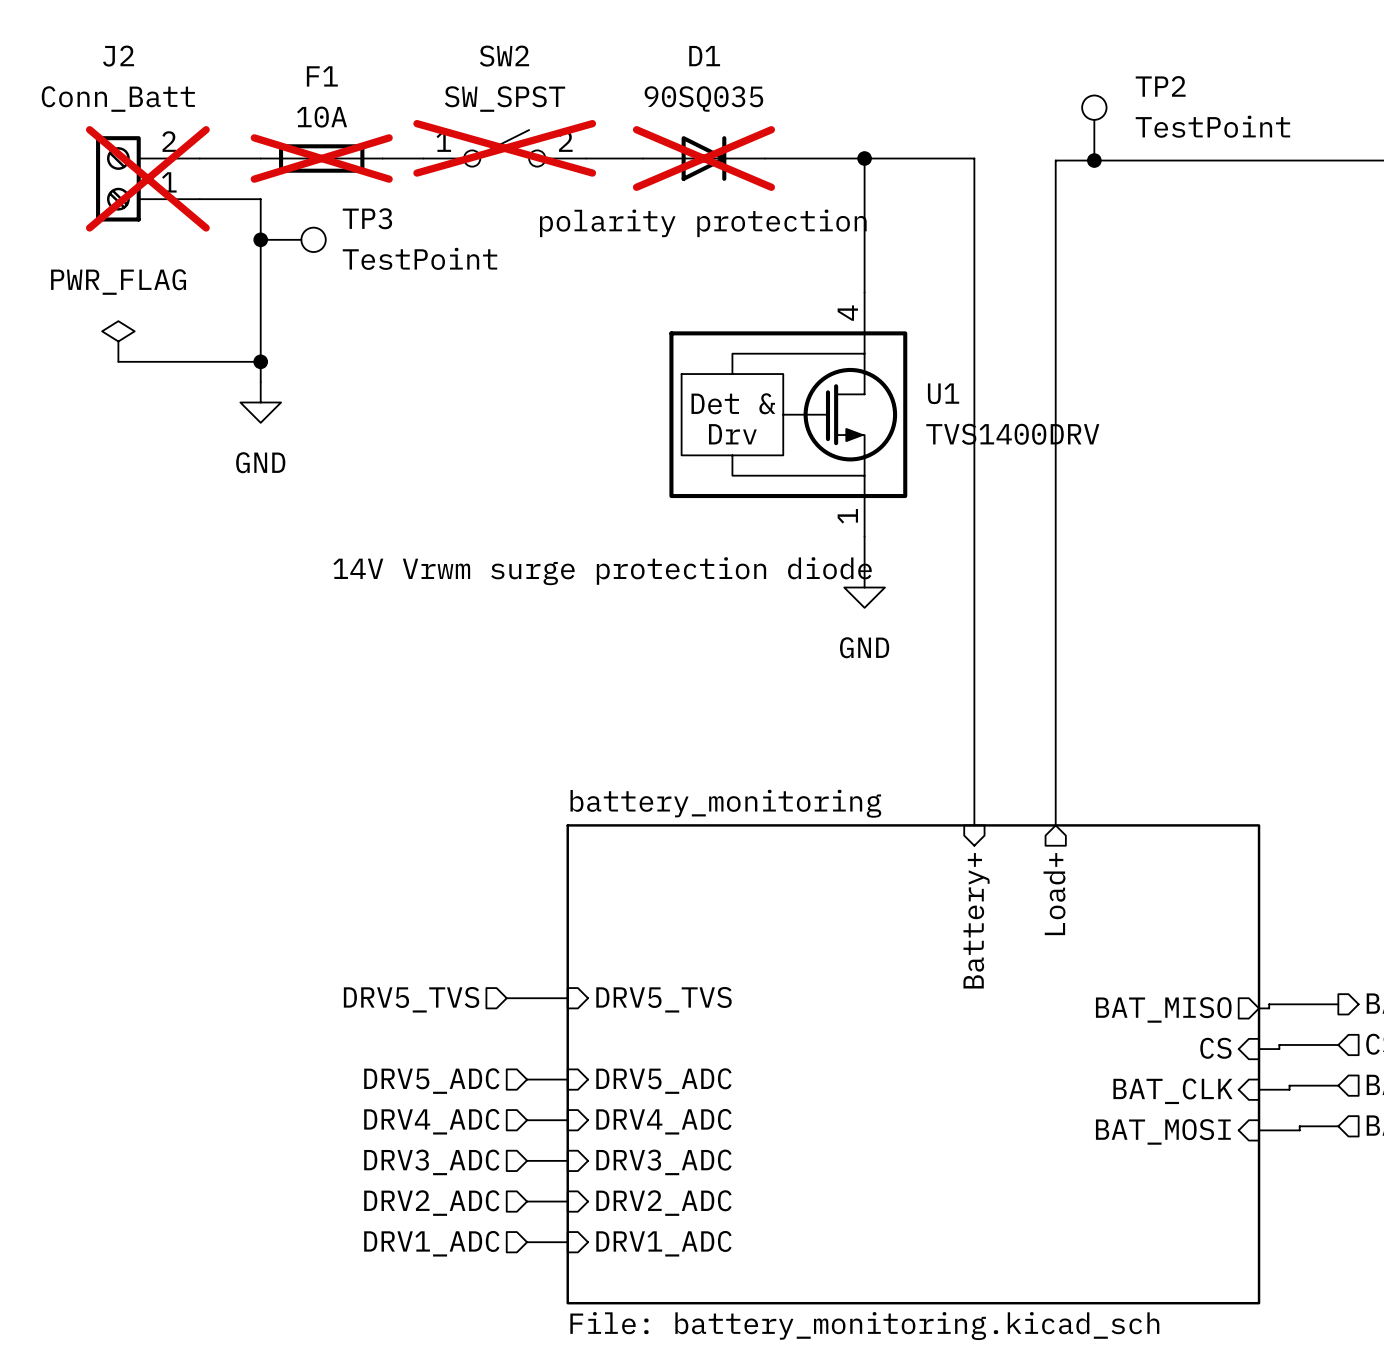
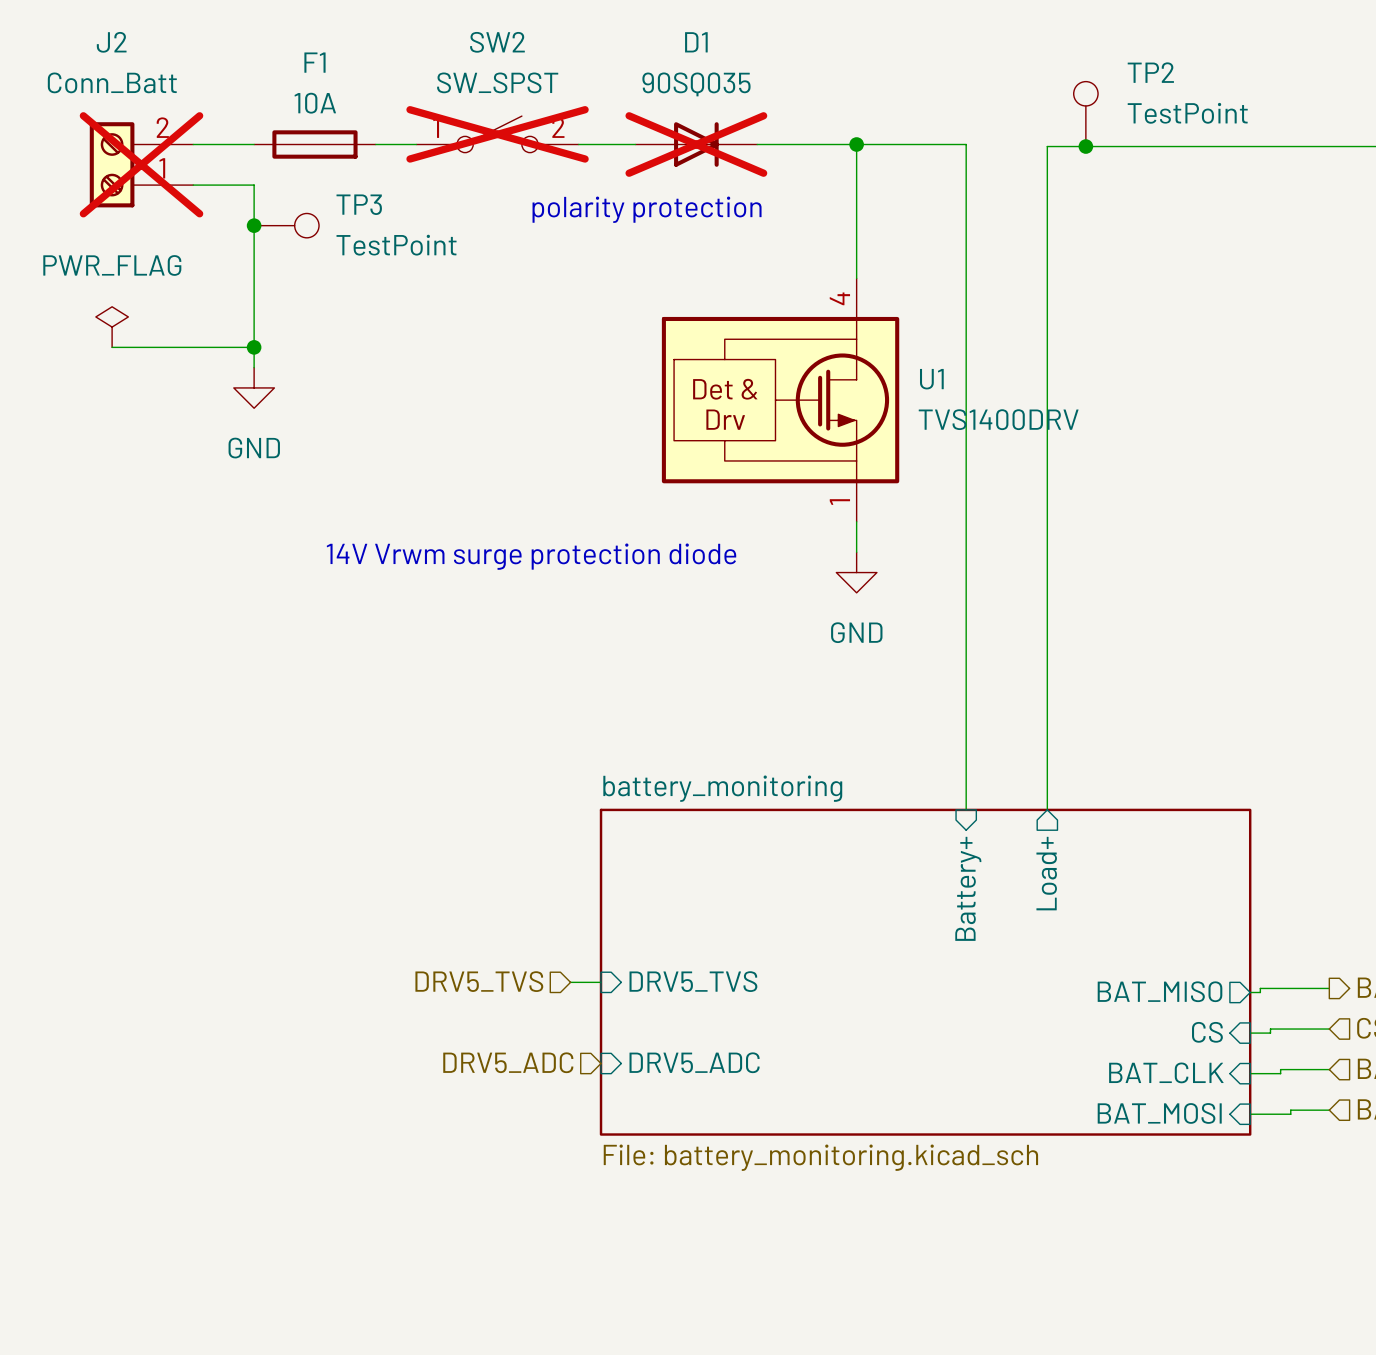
F1 do-not-place cross: (321, 158) -> none
sheet battery_monitoring: none -> File: battery_monitoring.kicad_sch (925, 972)
wire: (506, 998) (567, 998) -> none
wire: none -> (570, 982) (601, 982)
hierarchical label position: DRV5_TVS (411, 999) -> DRV5_TVS (479, 981)
sheet pin position: DRV5_TVS (664, 999) -> DRV5_TVS (693, 981)
sheet battery_monitoring: File: battery_monitoring.kicad_sch (913, 1064) -> none
wire: (527, 1079) (567, 1079) -> none
hierarchical label position: DRV5_ADC (431, 1081) -> DRV5_ADC (508, 1062)
sheet pin position: DRV5_ADC (663, 1081) -> DRV5_ADC (694, 1062)
wire: (527, 1120) (567, 1120) -> none
hierarchical label: DRV4_ADC (431, 1121) -> none
sheet pin: DRV4_ADC (663, 1121) -> none
wire: (527, 1160) (567, 1160) -> none
hierarchical label: DRV3_ADC (431, 1162) -> none
sheet pin: DRV3_ADC (663, 1162) -> none
wire: (527, 1201) (567, 1201) -> none
hierarchical label: DRV2_ADC (431, 1203) -> none
sheet pin: DRV2_ADC (663, 1203) -> none
wire: (527, 1242) (567, 1242) -> none
hierarchical label: DRV1_ADC (431, 1243) -> none
sheet pin: DRV1_ADC (663, 1243) -> none

